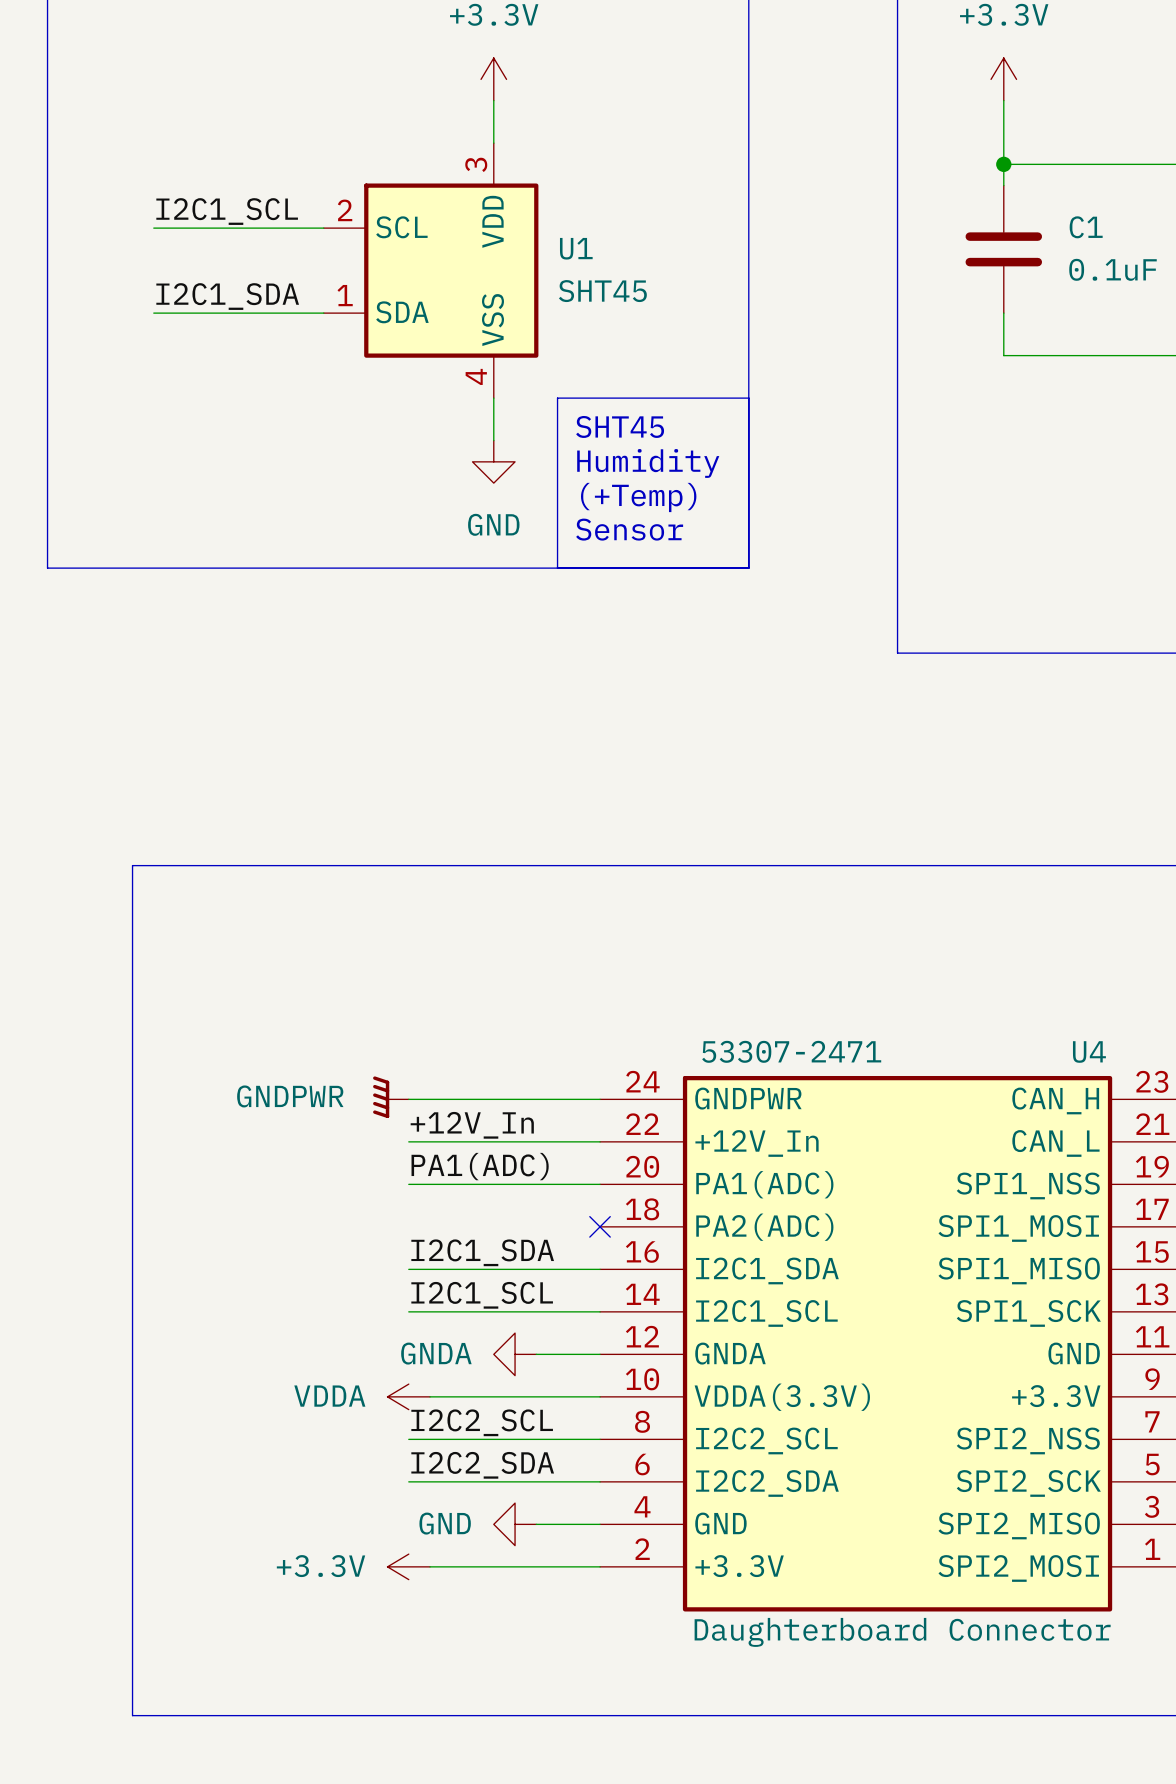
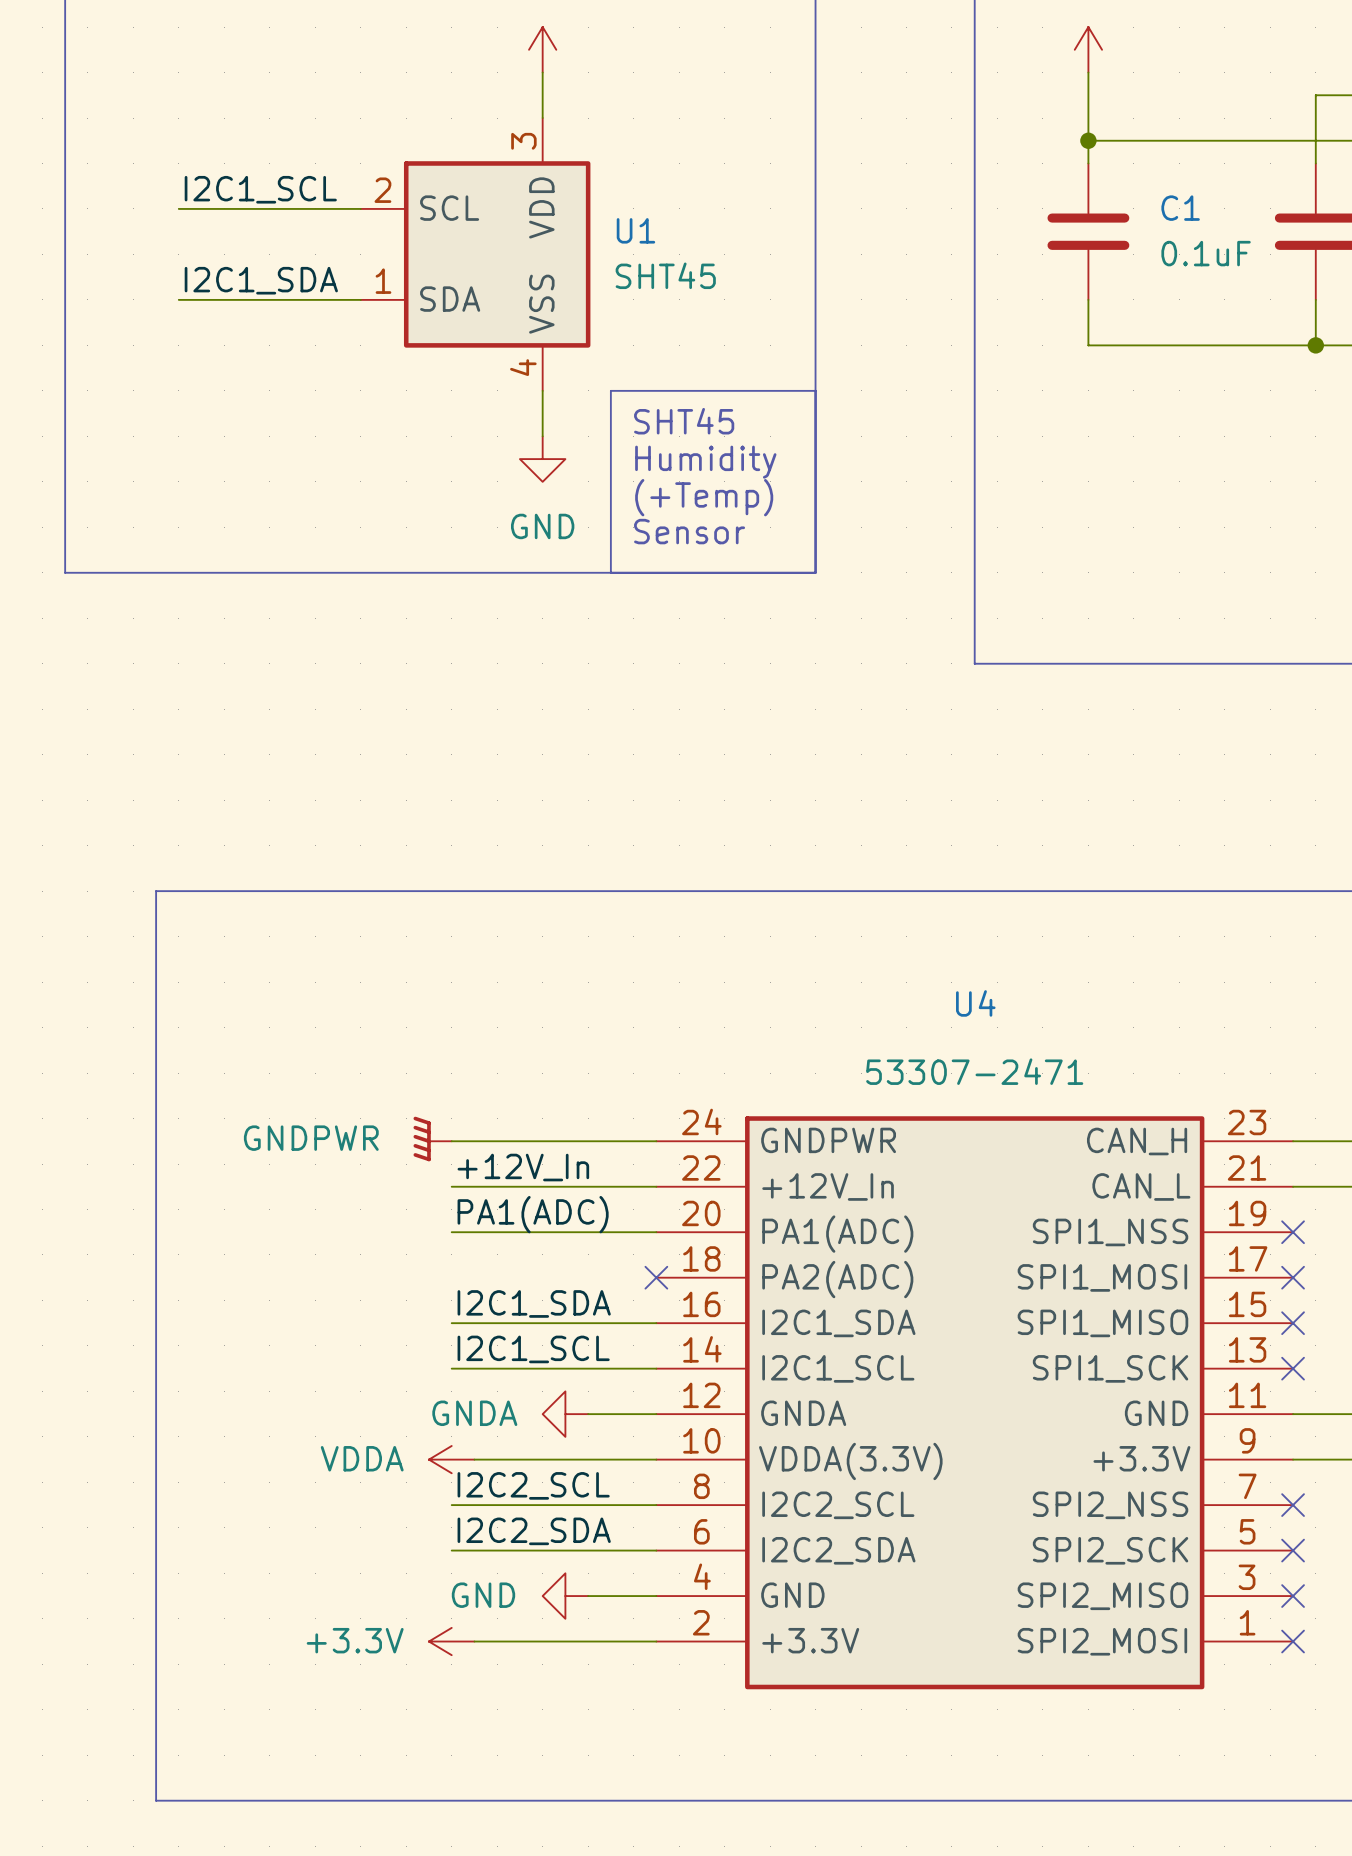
U4 text position: 53307-2471 (791, 1051) -> 53307-2471 (974, 1071)
U4 name position: U4 (1089, 1052) -> U4 (975, 1003)
U4 value: Daughterboard Connector (902, 1632) -> none

